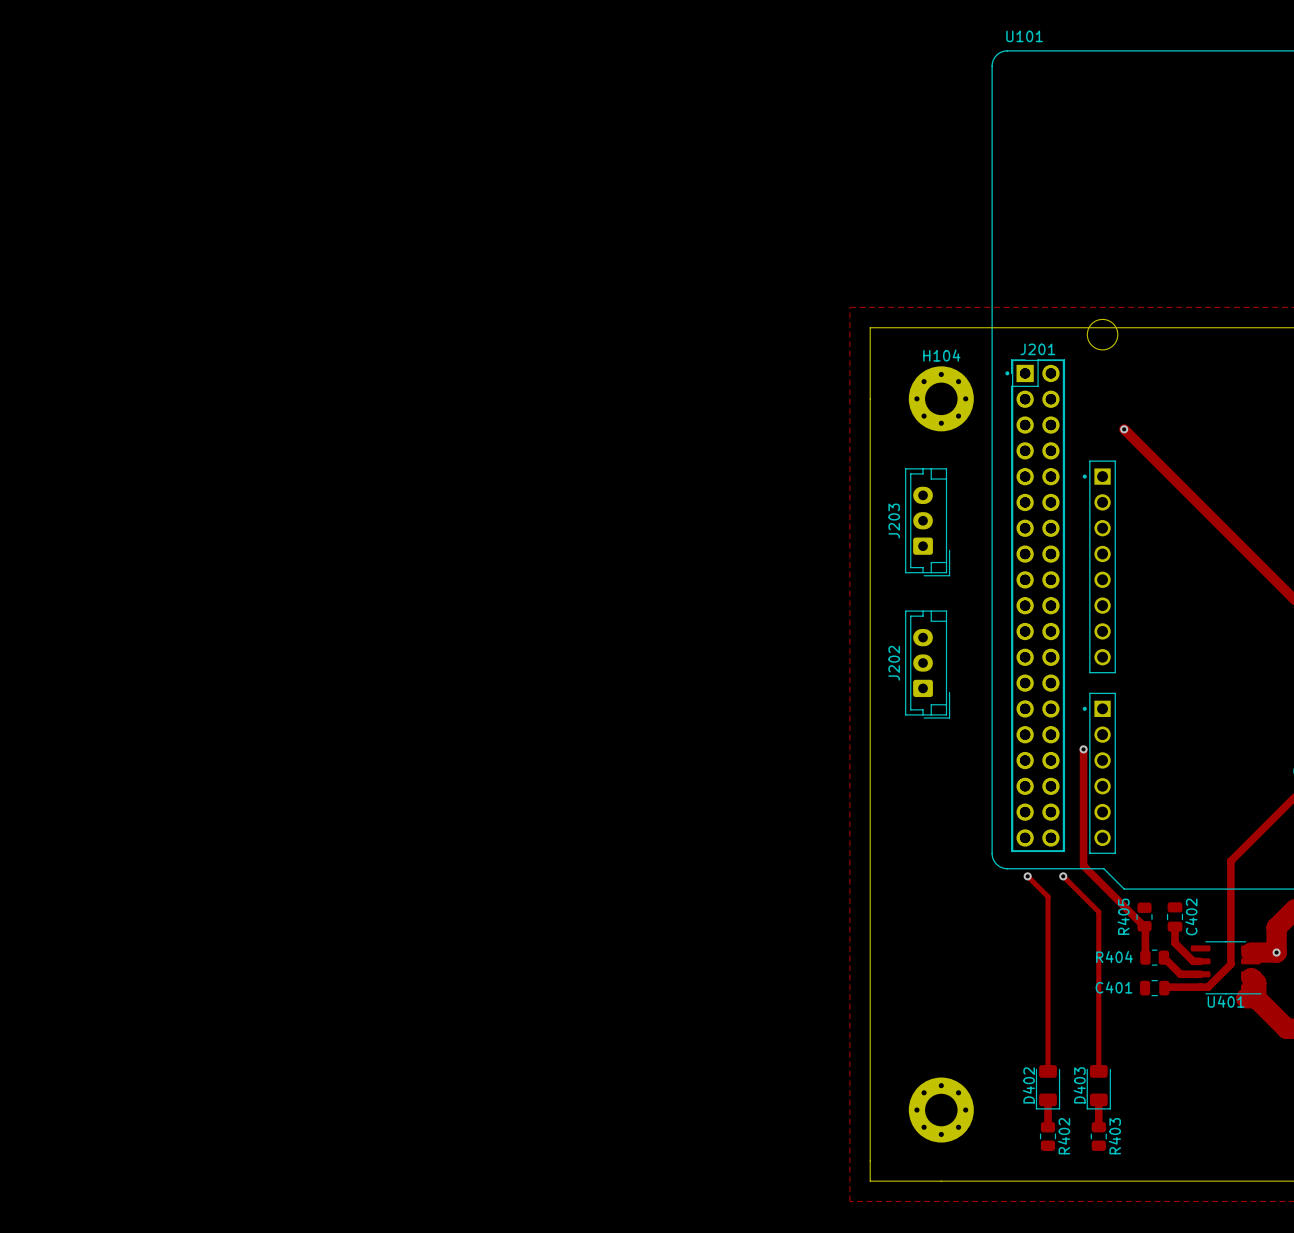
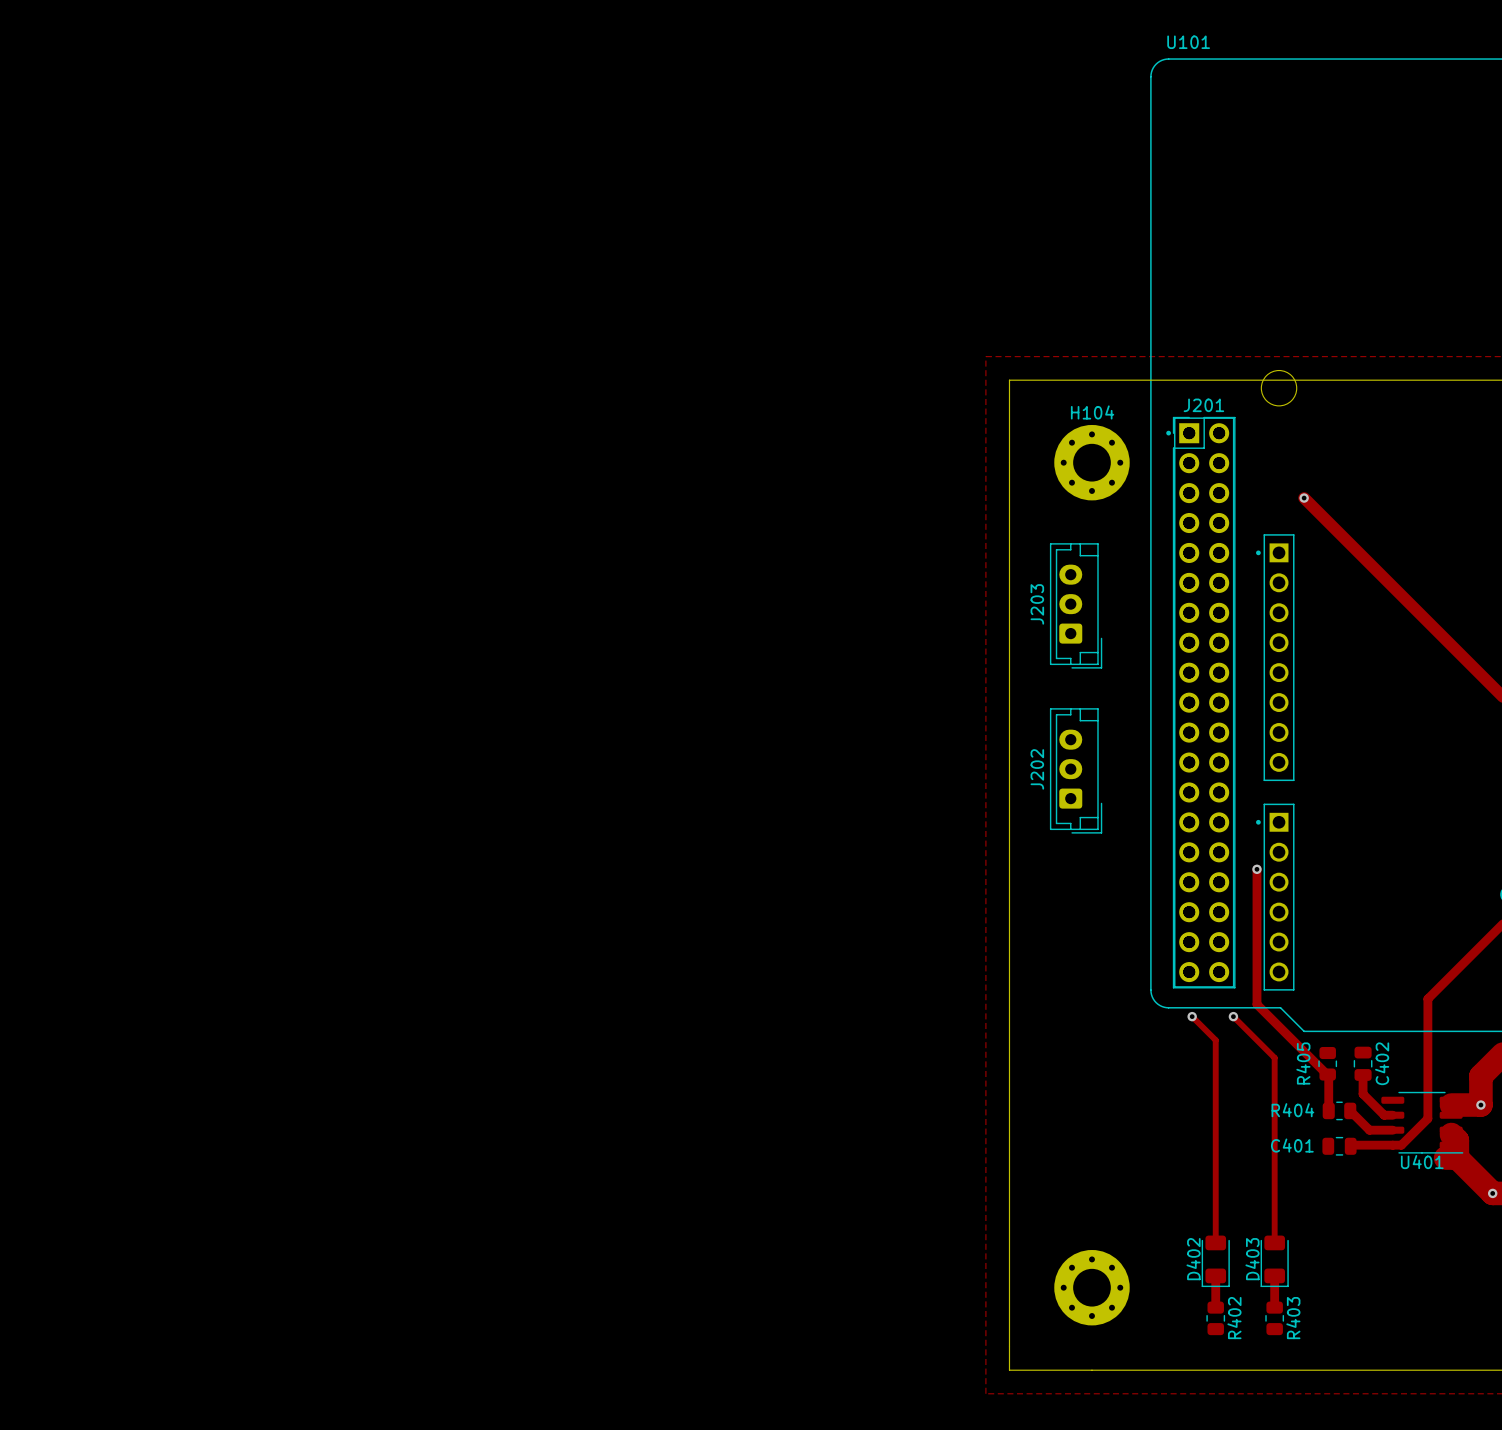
via: none -> (1492, 1193)

